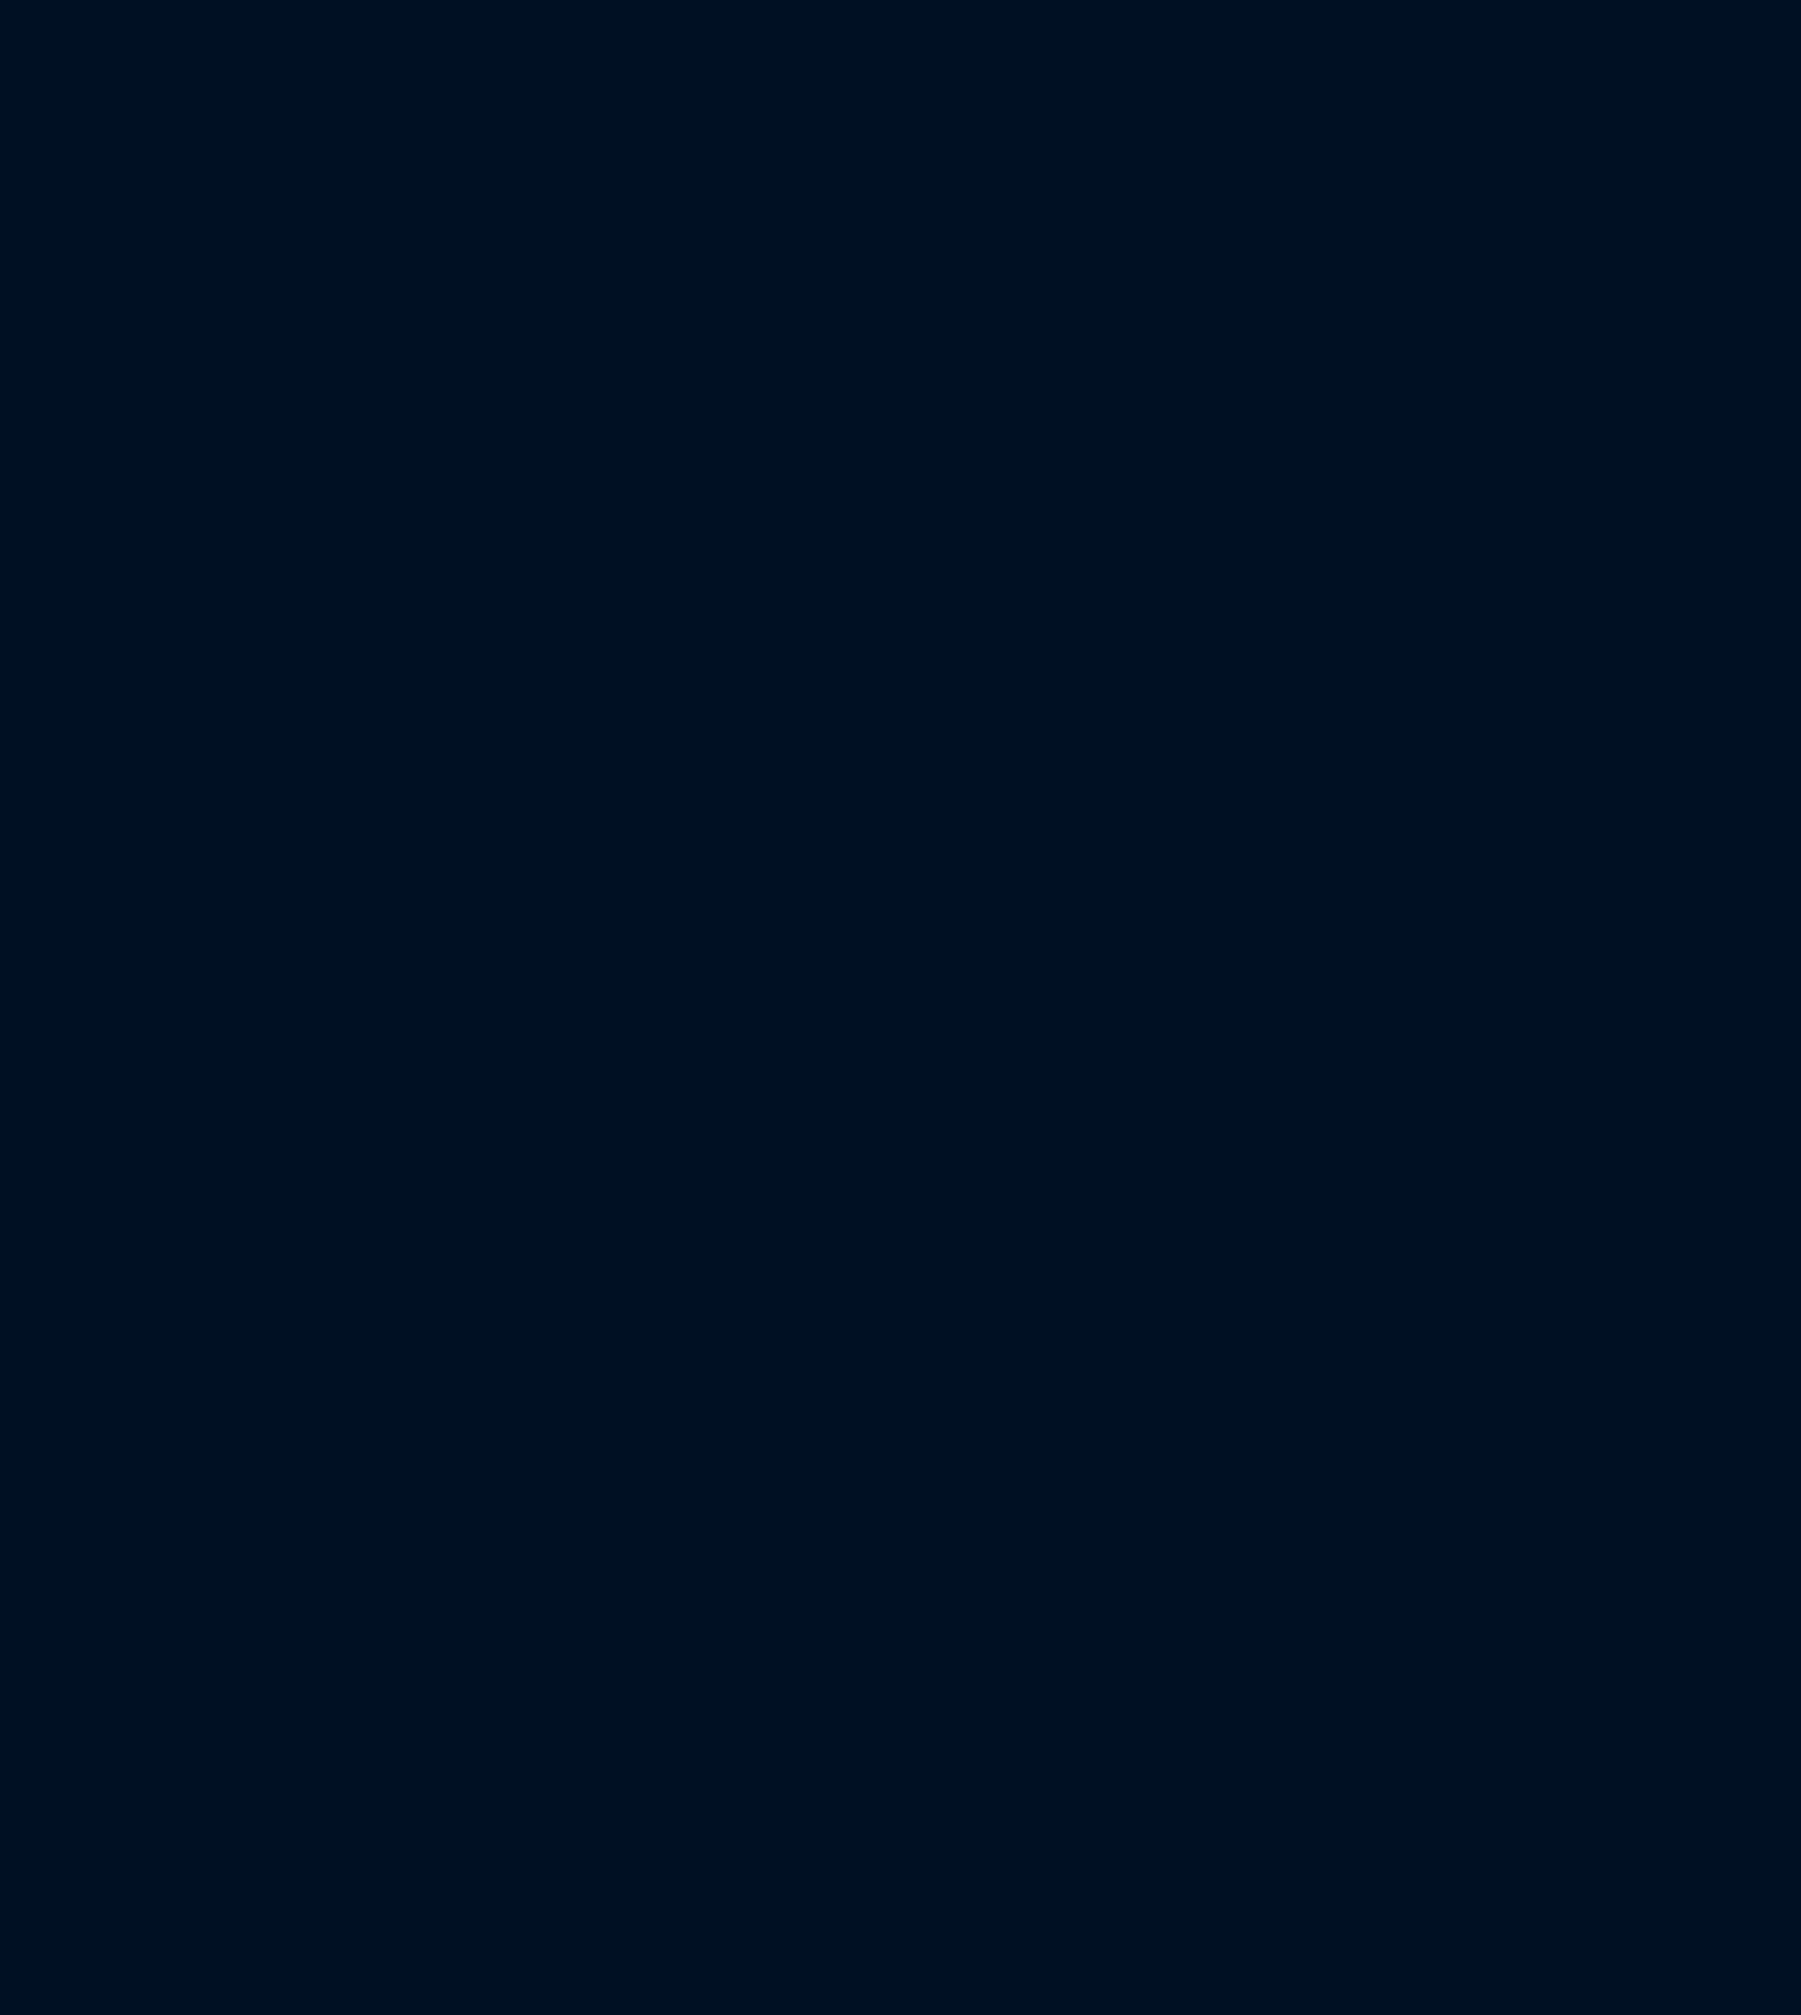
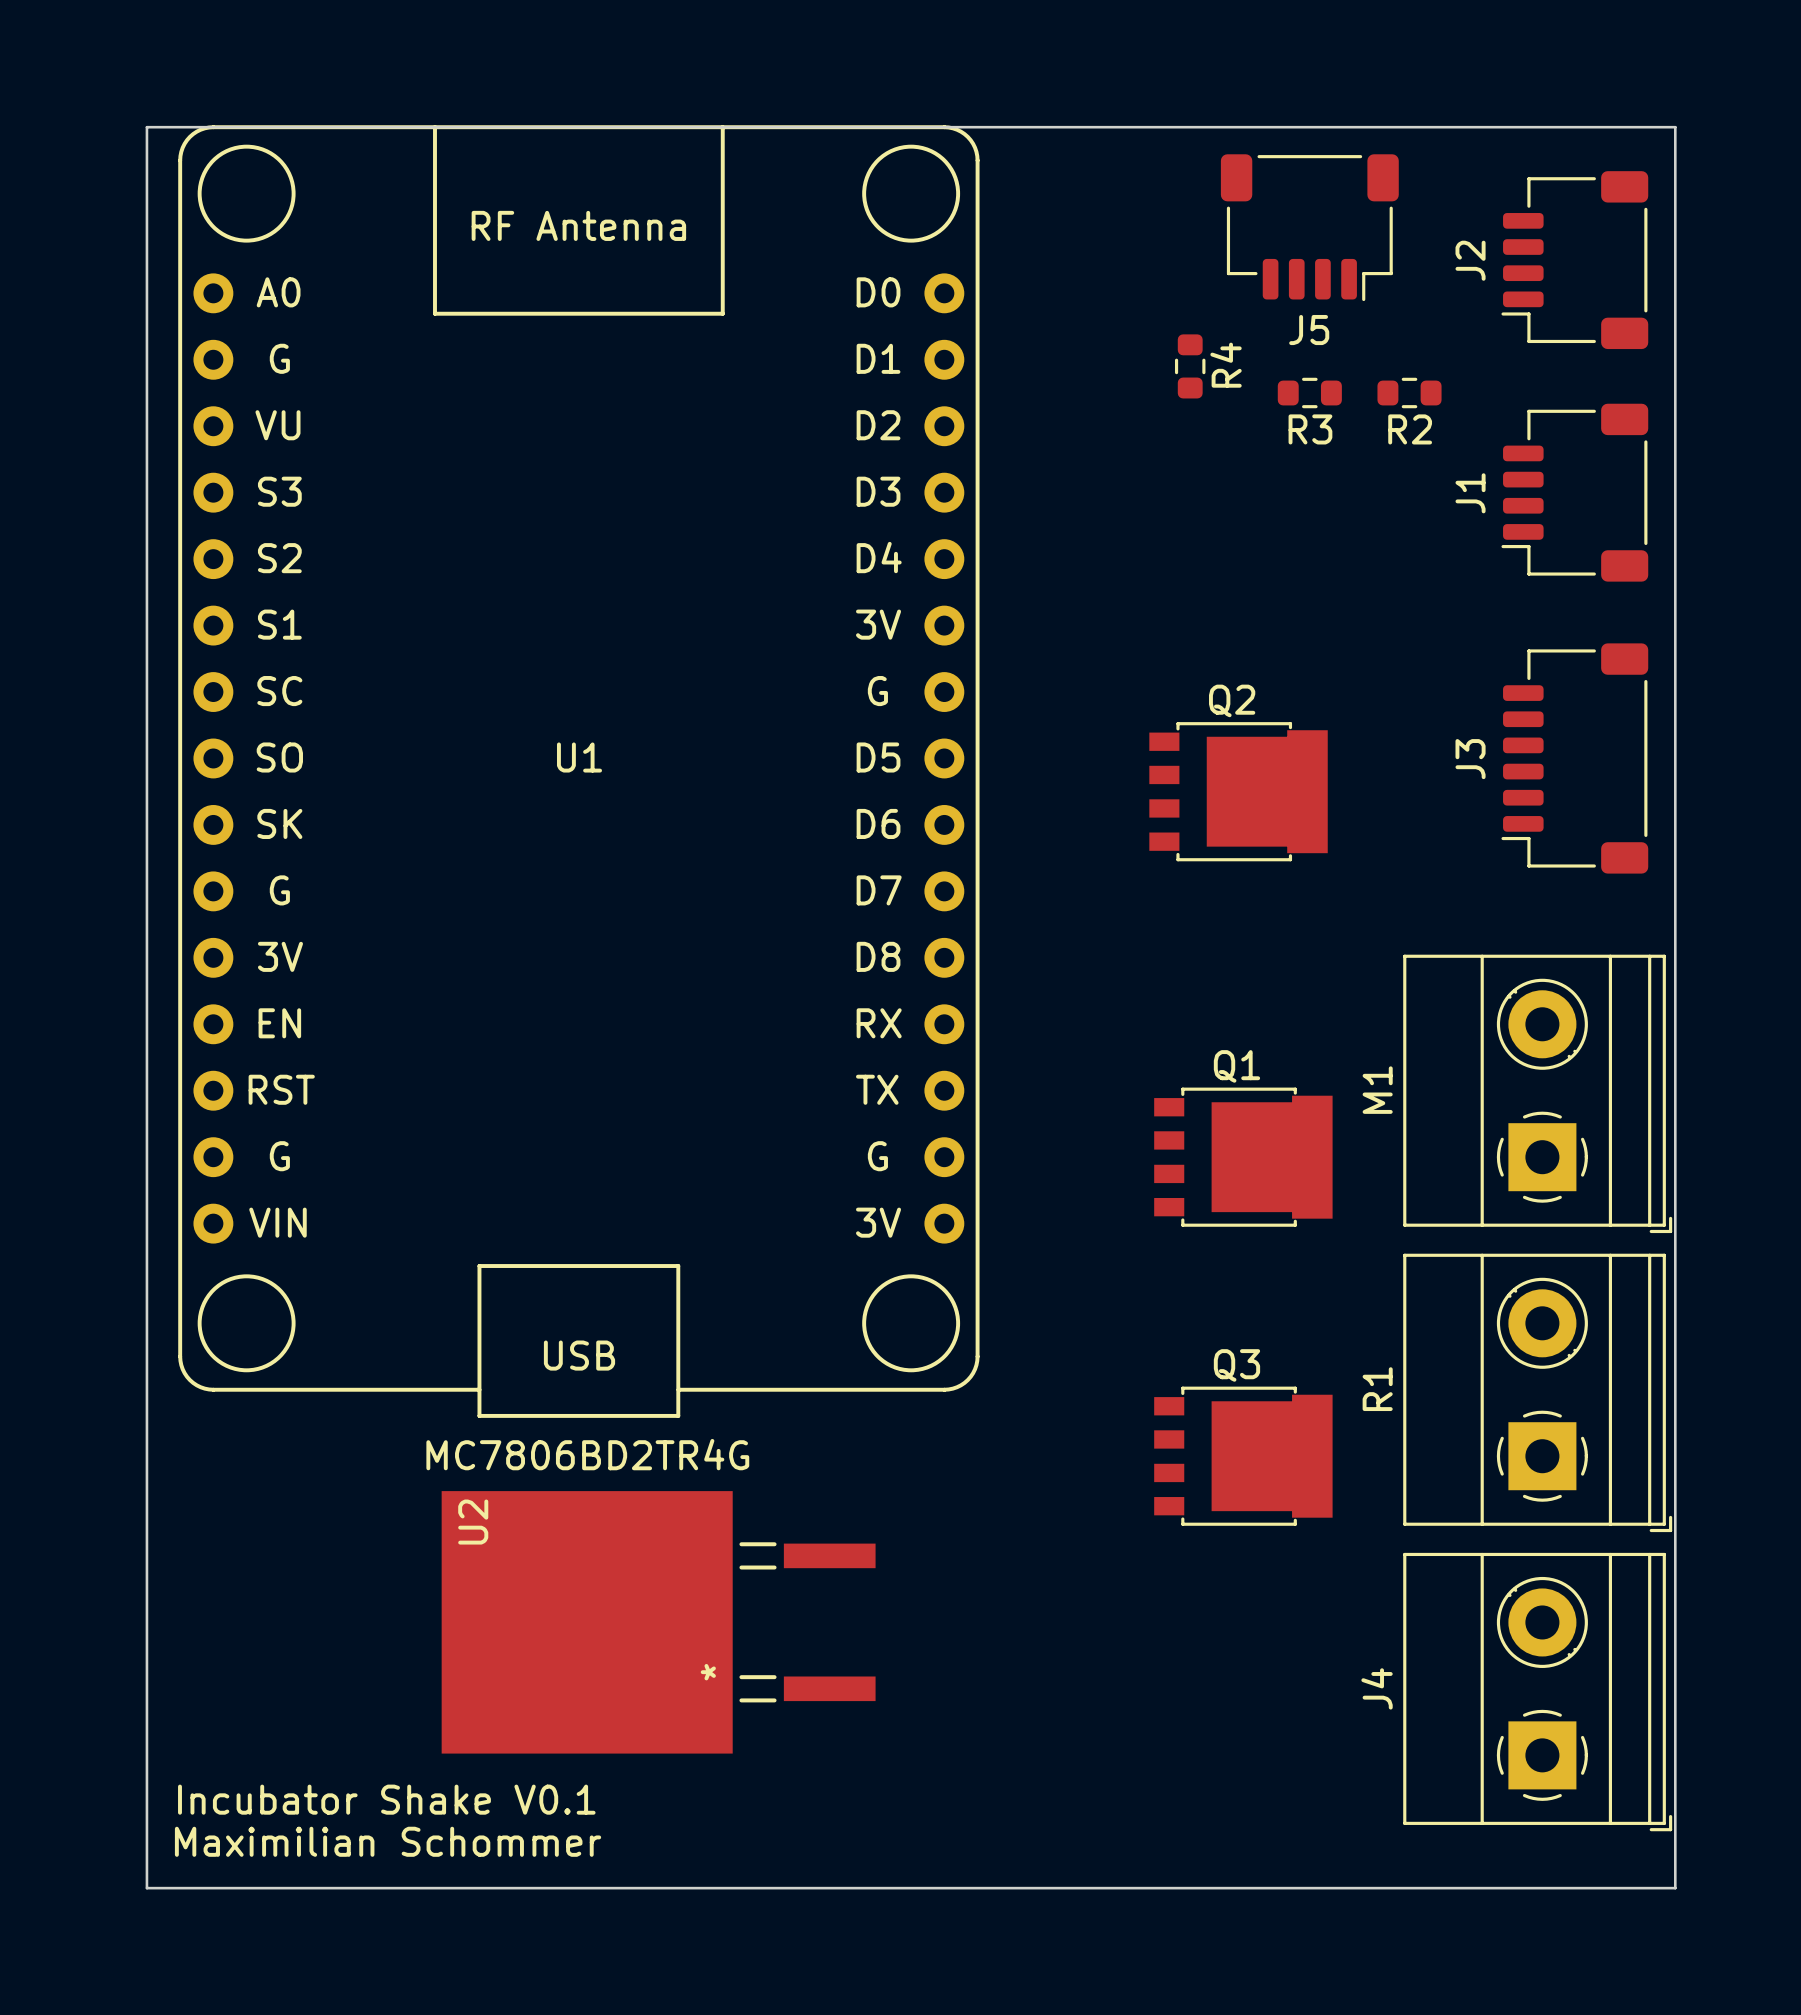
board edge: none -> (146, 127) (1675, 127) (1675, 1888) (146, 1888) (146, 127)
J5: none -> (1309, 227)
J2: none -> (1574, 260)
R4: none -> (1190, 366)
R3: none -> (1309, 393)
R2: none -> (1409, 393)
J1: none -> (1574, 492)
J3: none -> (1574, 758)
U1: none -> (578, 771)
Q2: none -> (1238, 791)
M1: none -> (1537, 1093)
Q1: none -> (1243, 1157)
R1: none -> (1537, 1392)
Q3: none -> (1243, 1456)
U2: none -> MC7806BD2TR4G (658, 1622)
J4: none -> (1537, 1692)
text: none -> Incubator Shake V0.1 (386, 1799)
text: none -> Maximilian Schommer (388, 1841)

